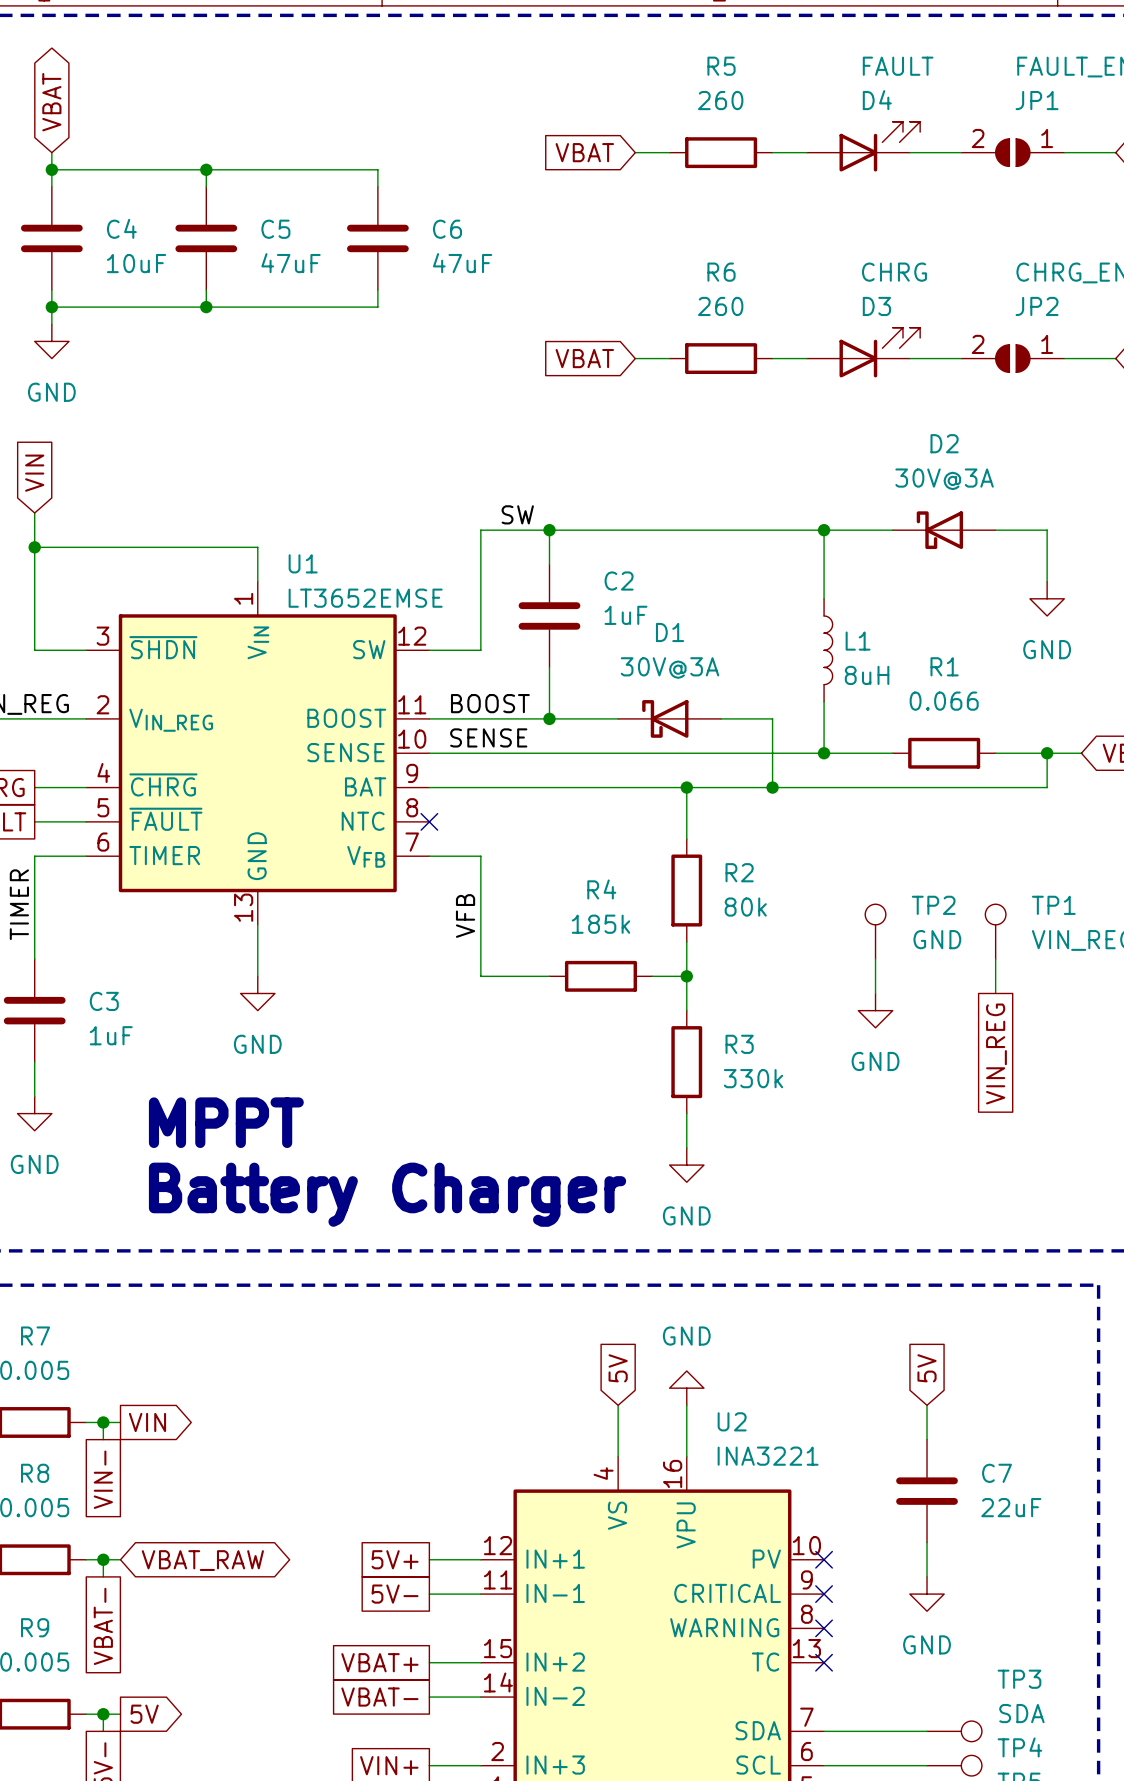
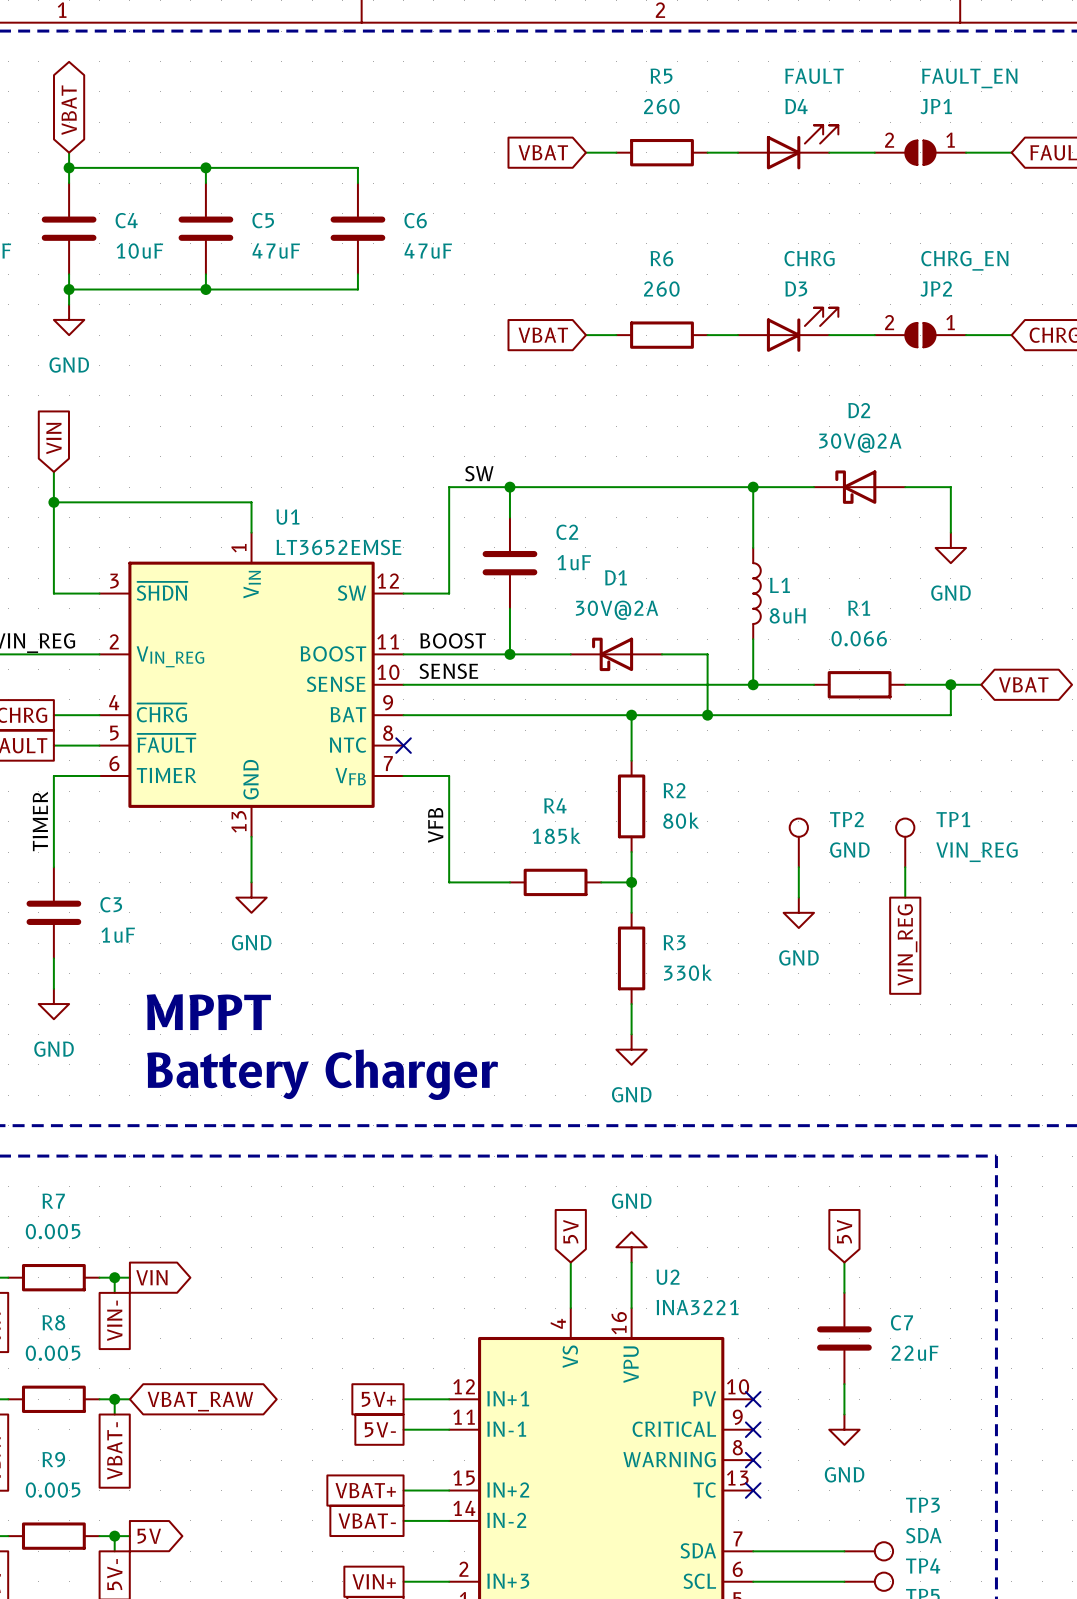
D2 value: 30V@3A (944, 479) -> 30V@2A (860, 443)
D1 value: 30V@3A (670, 668) -> 30V@2A (617, 610)

